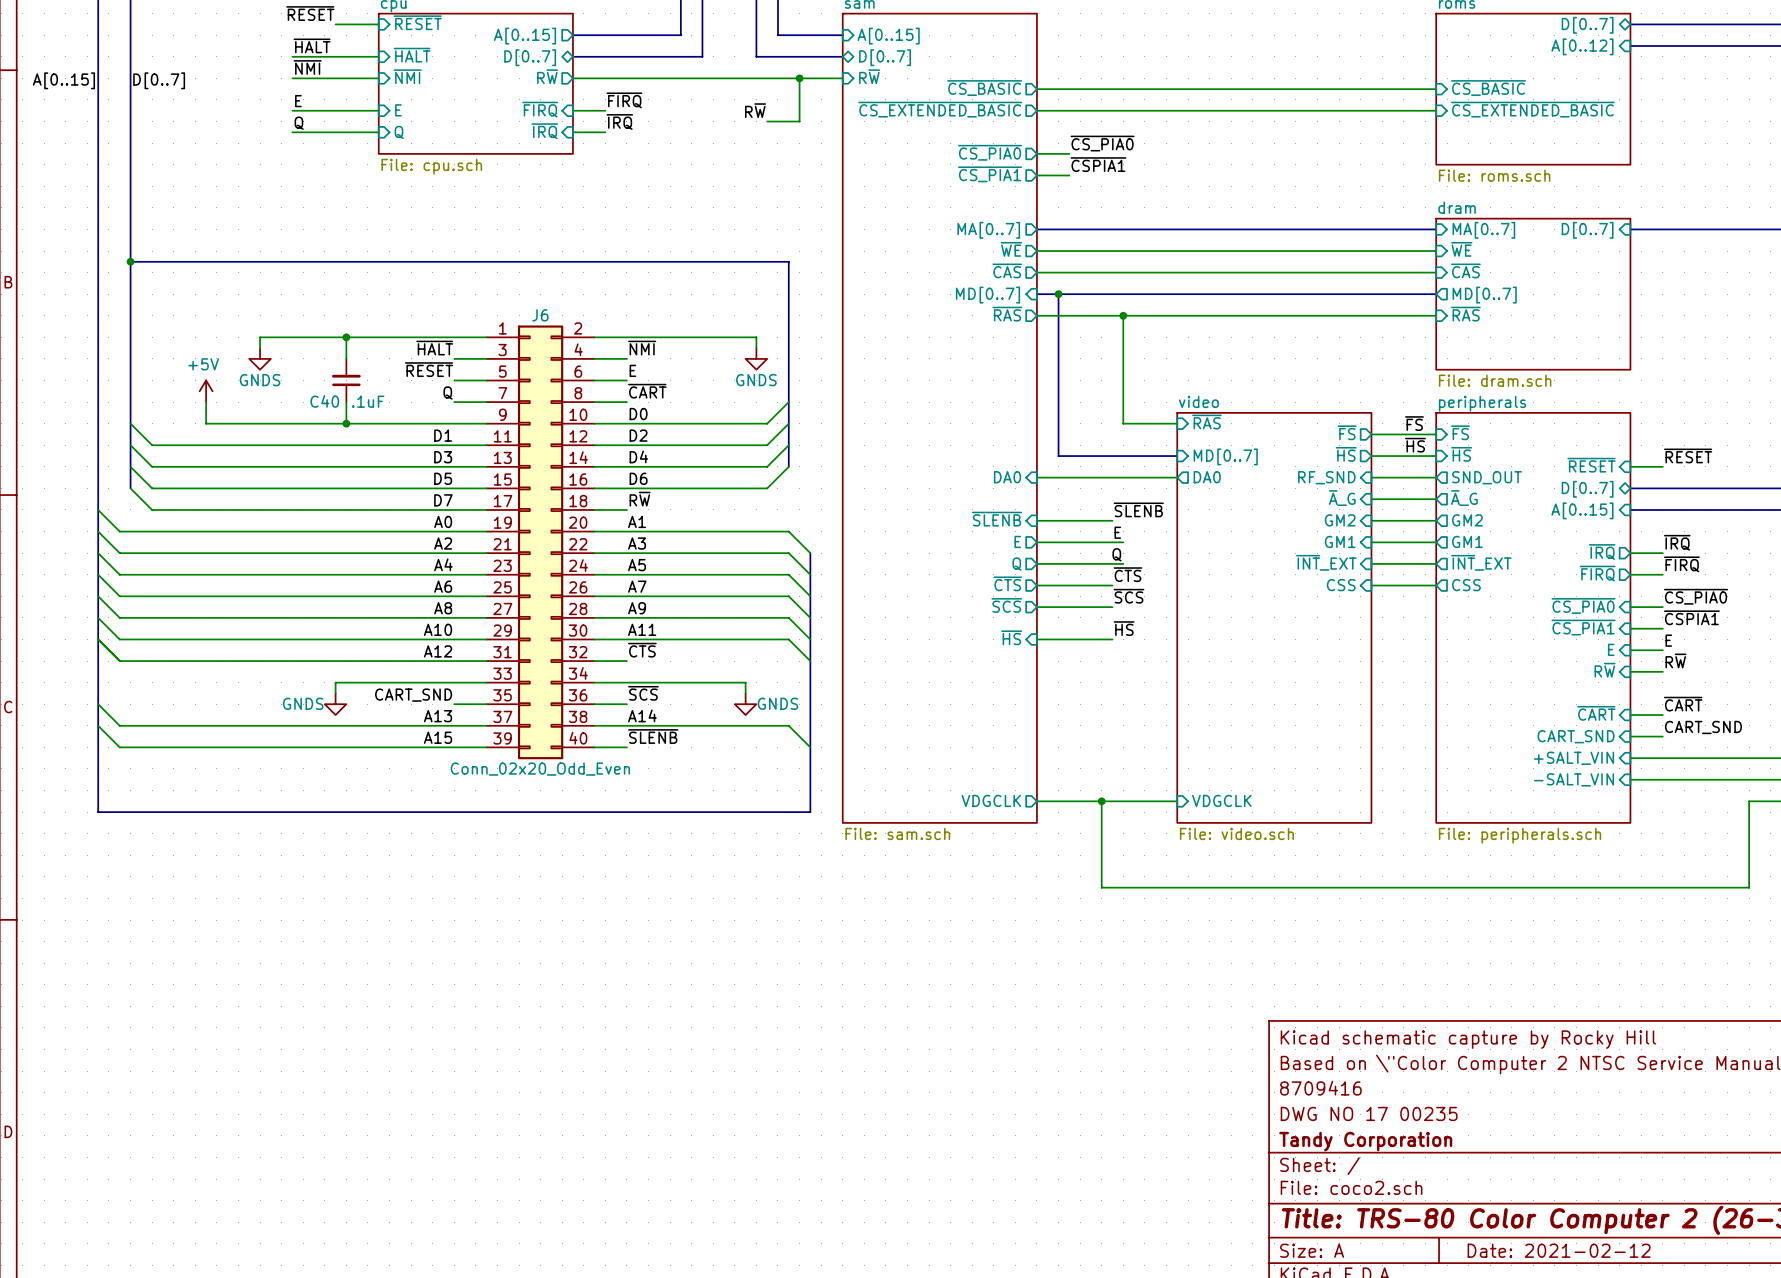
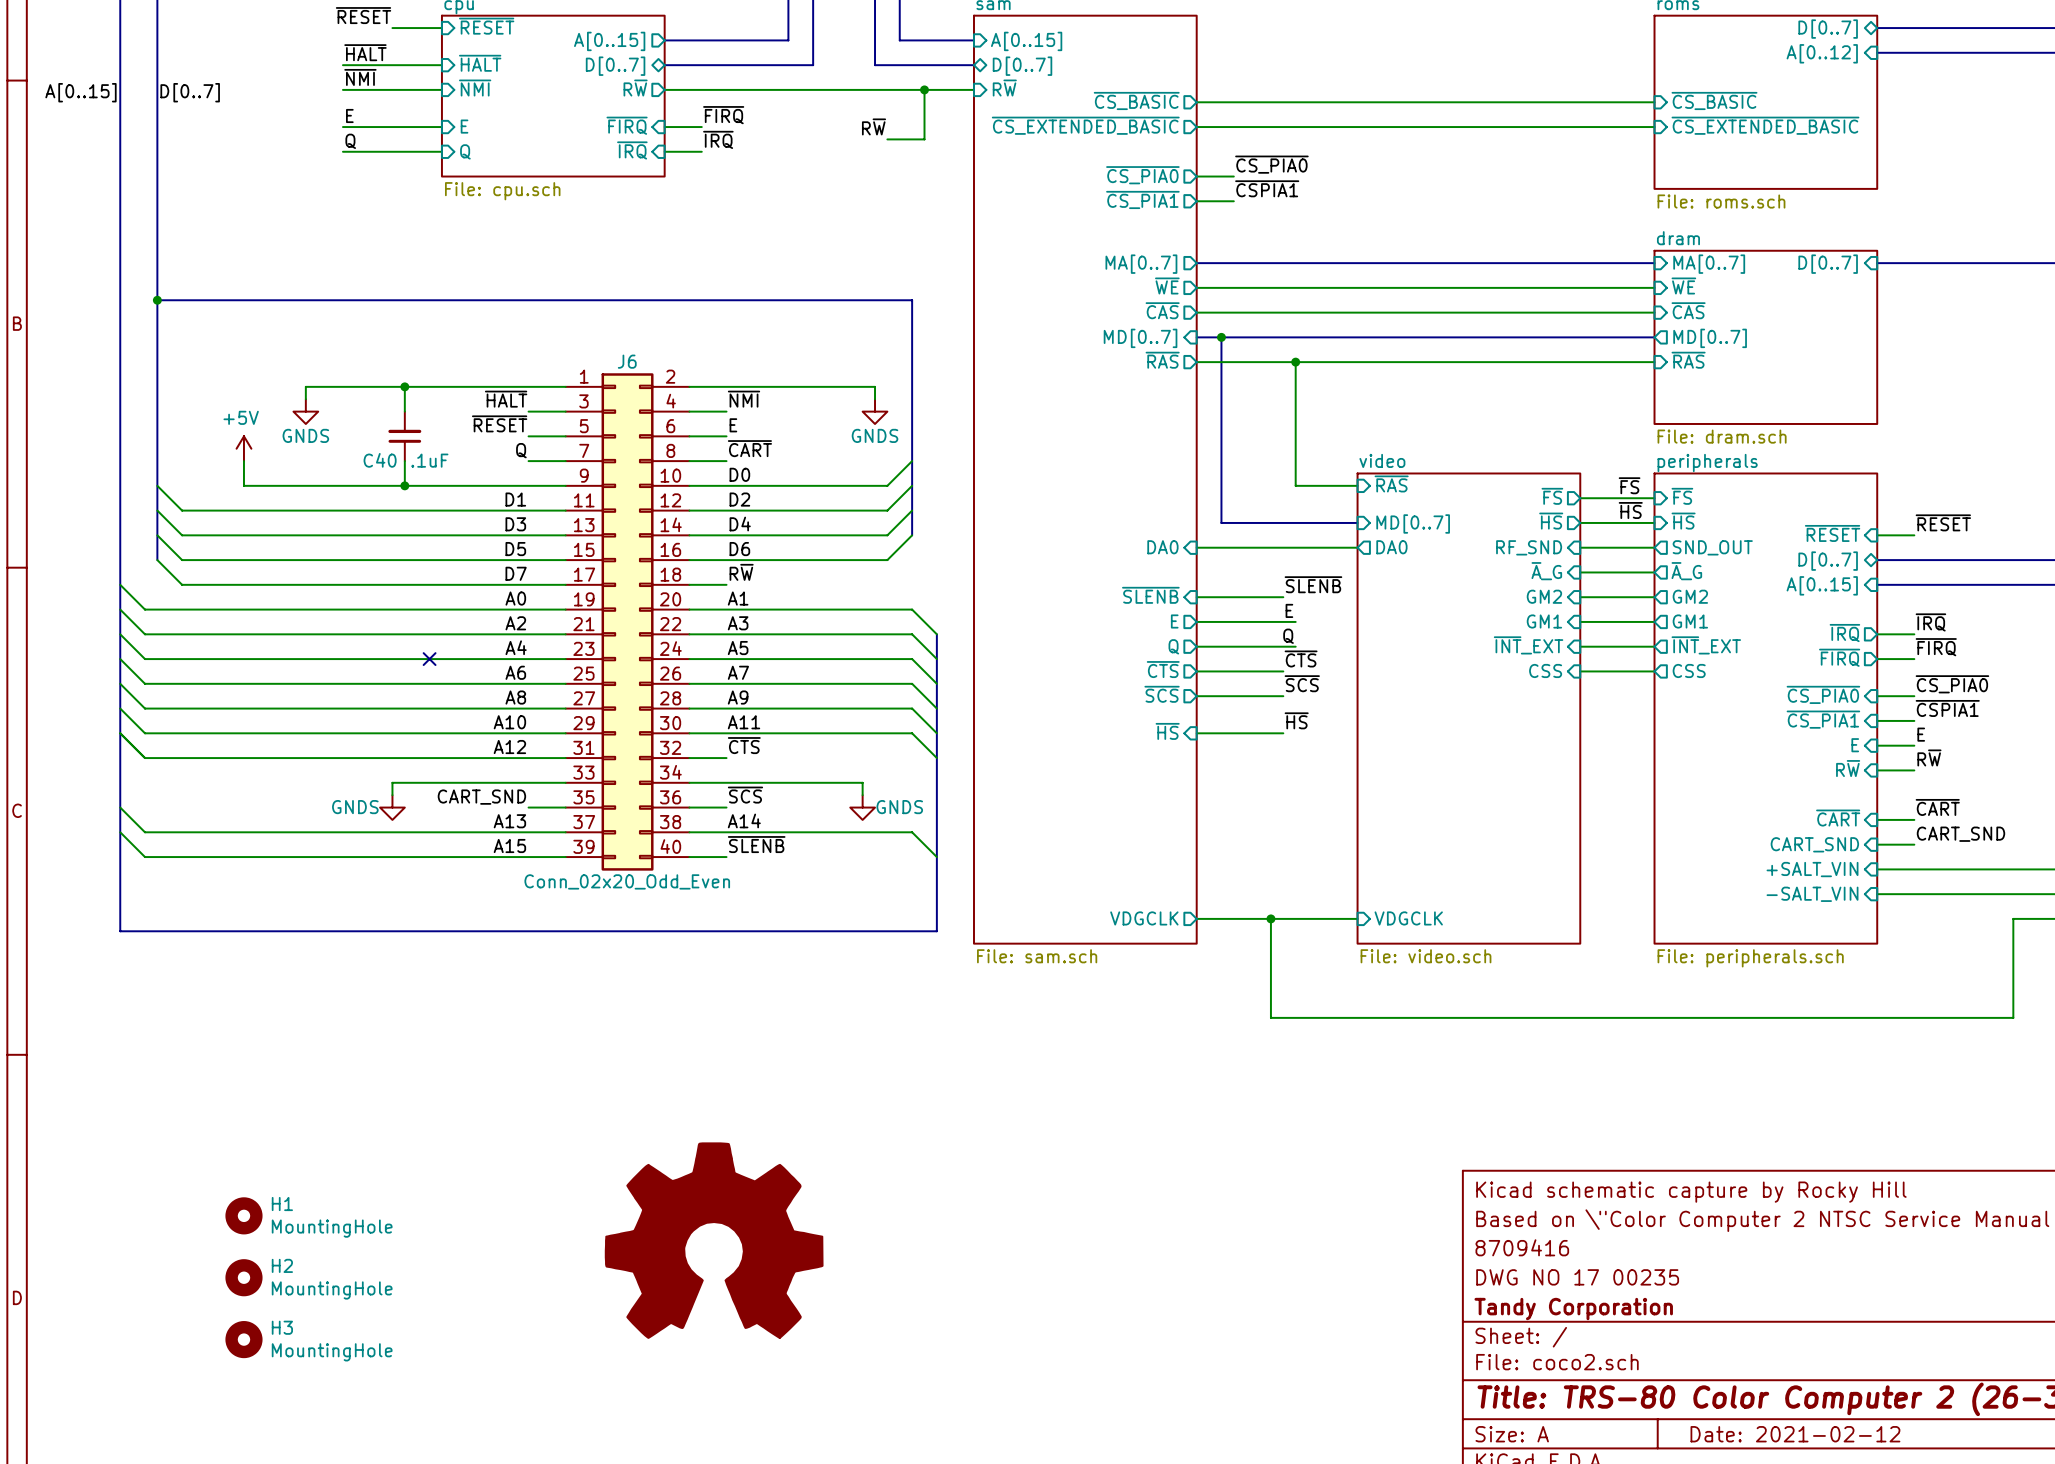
no-connect mark: none -> (429, 659)
H1: none -> MountingHole (243, 1215)
power symbol: none -> (714, 1240)
H2: none -> MountingHole (243, 1277)
H3: none -> MountingHole (243, 1339)

